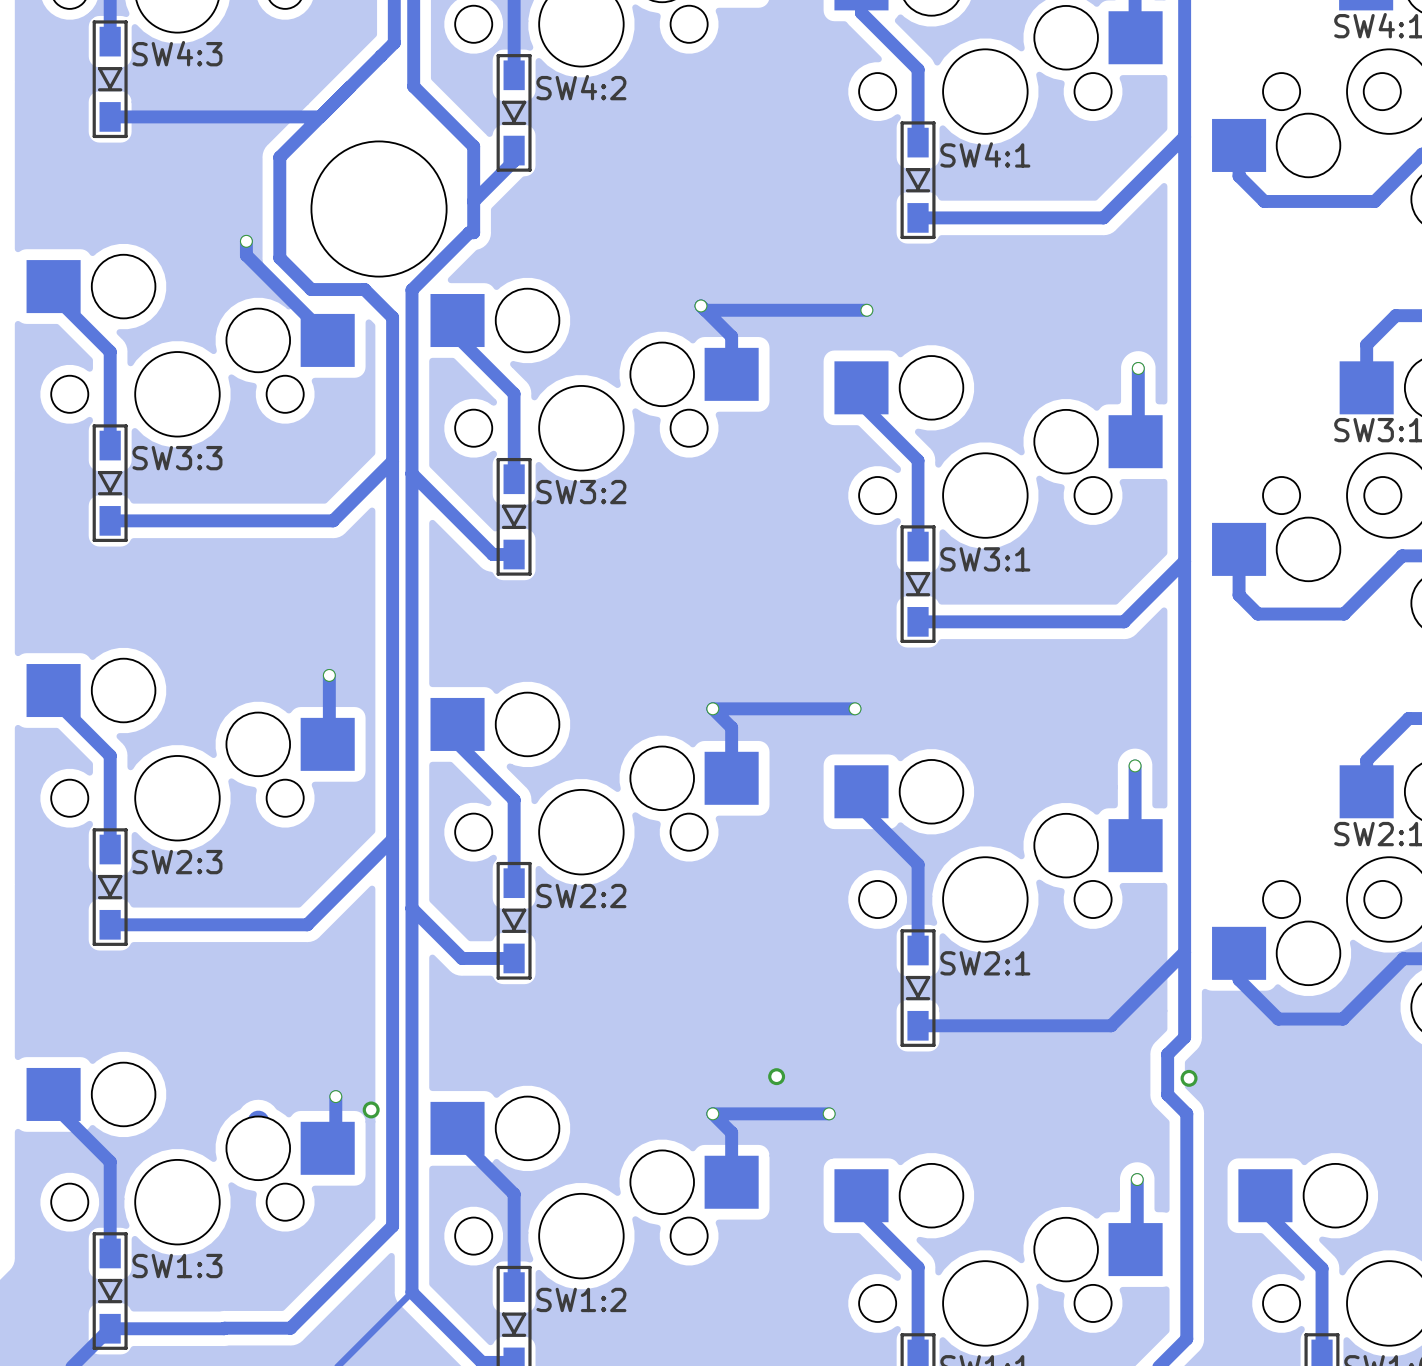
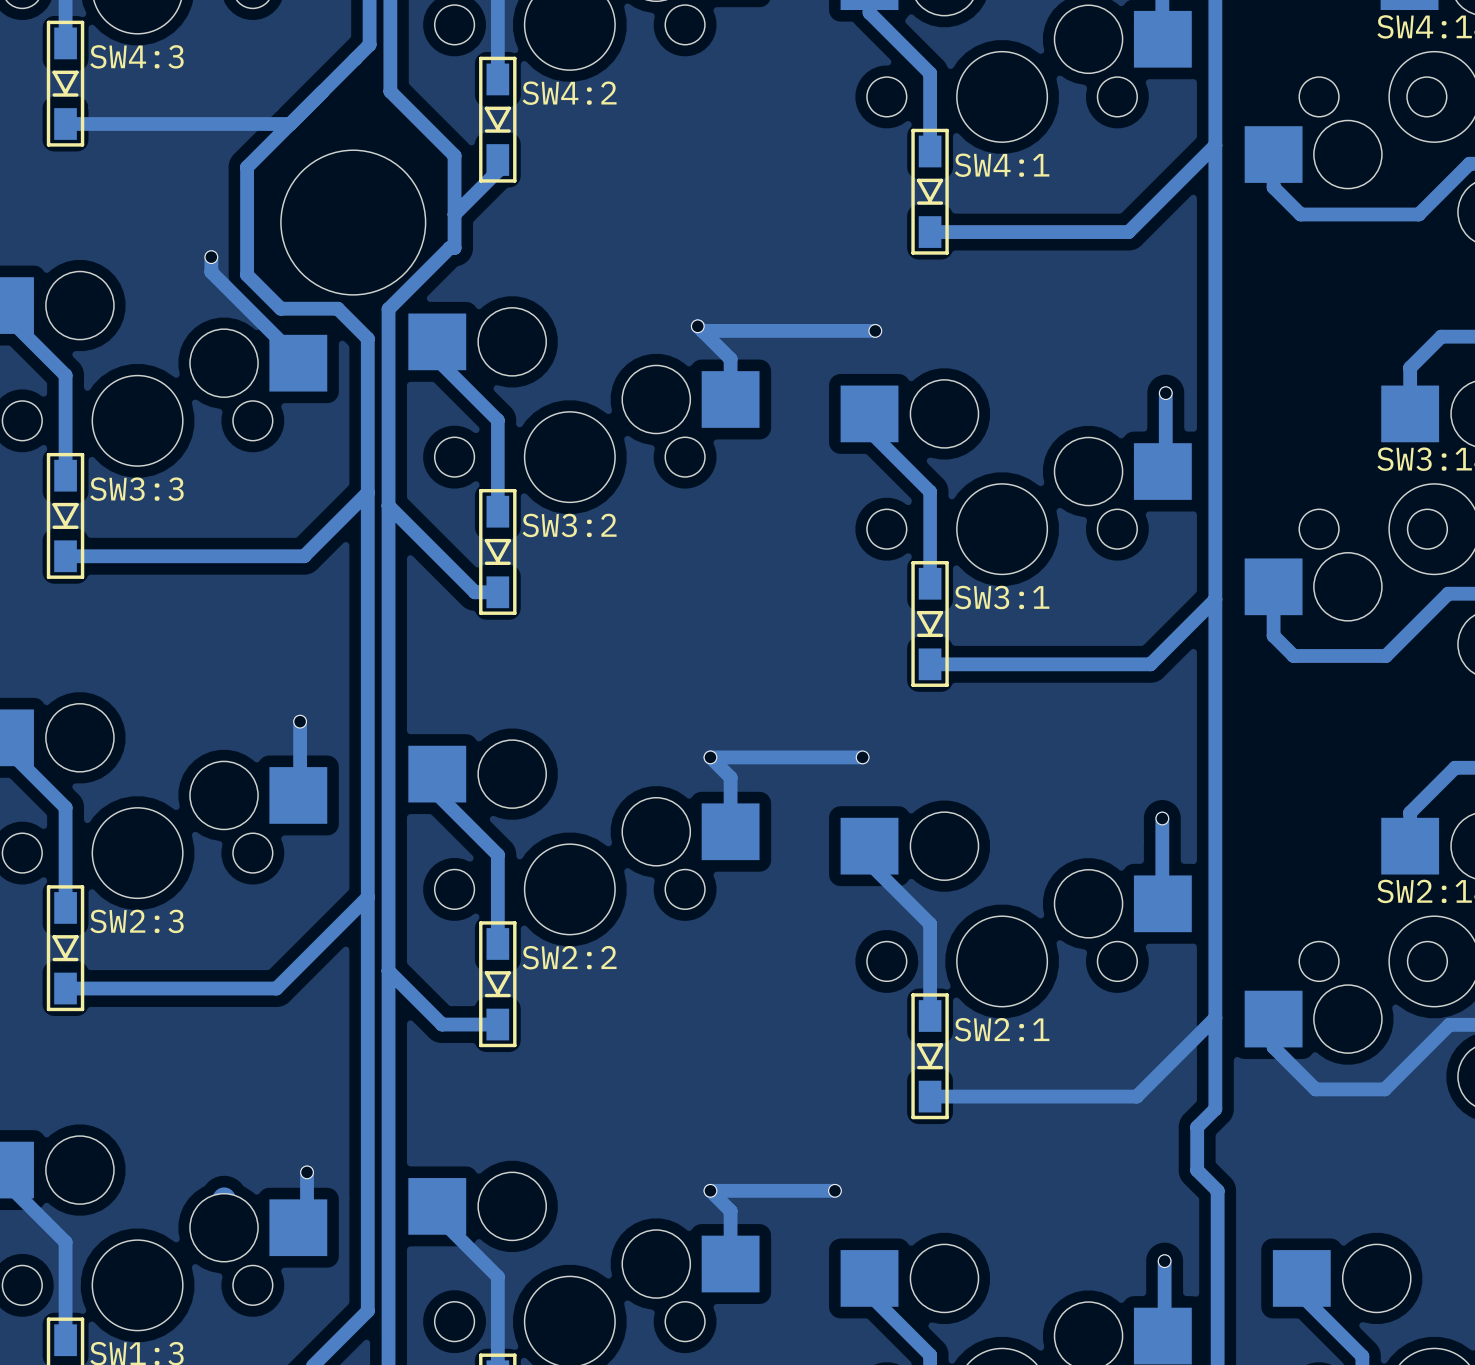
part: (776, 1076) -> none
part: (1189, 1078) -> none
part: (371, 1109) -> none

